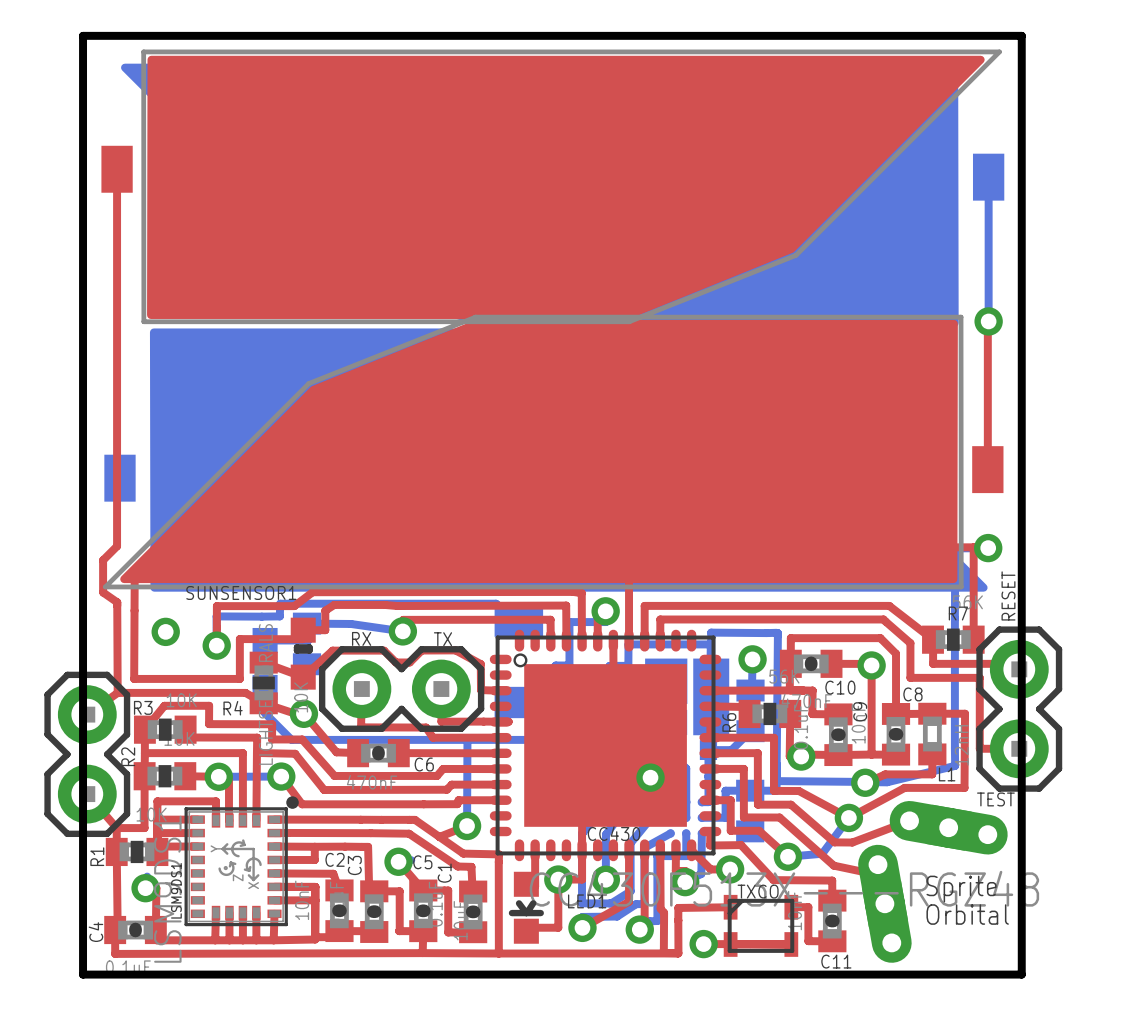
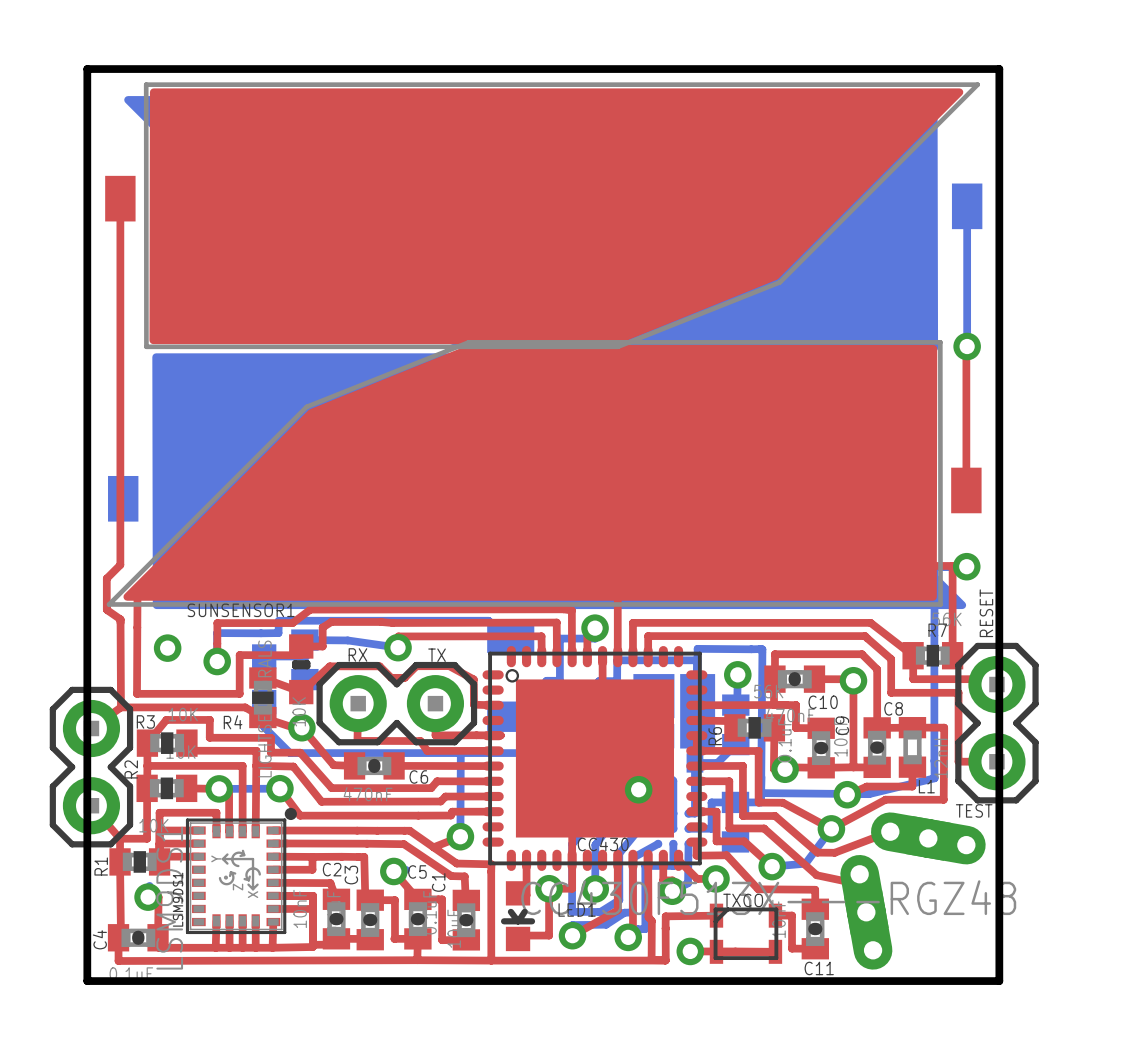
text: Sprite (961, 889) -> none
text: Orbital (967, 914) -> none

